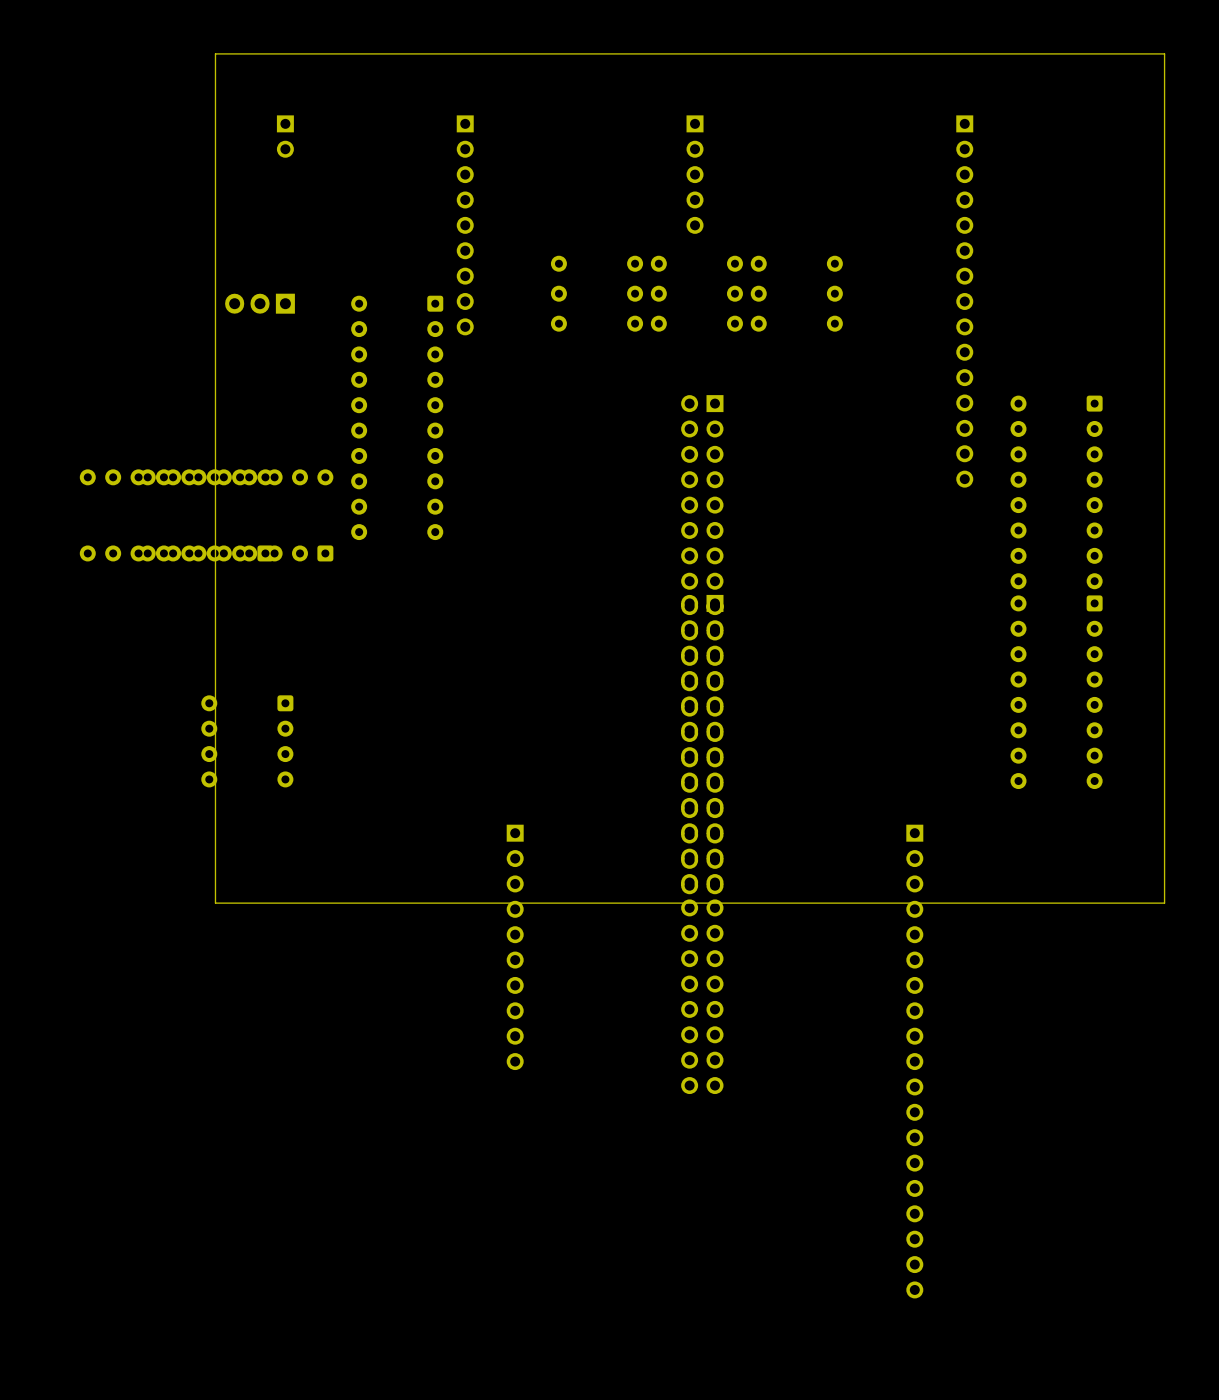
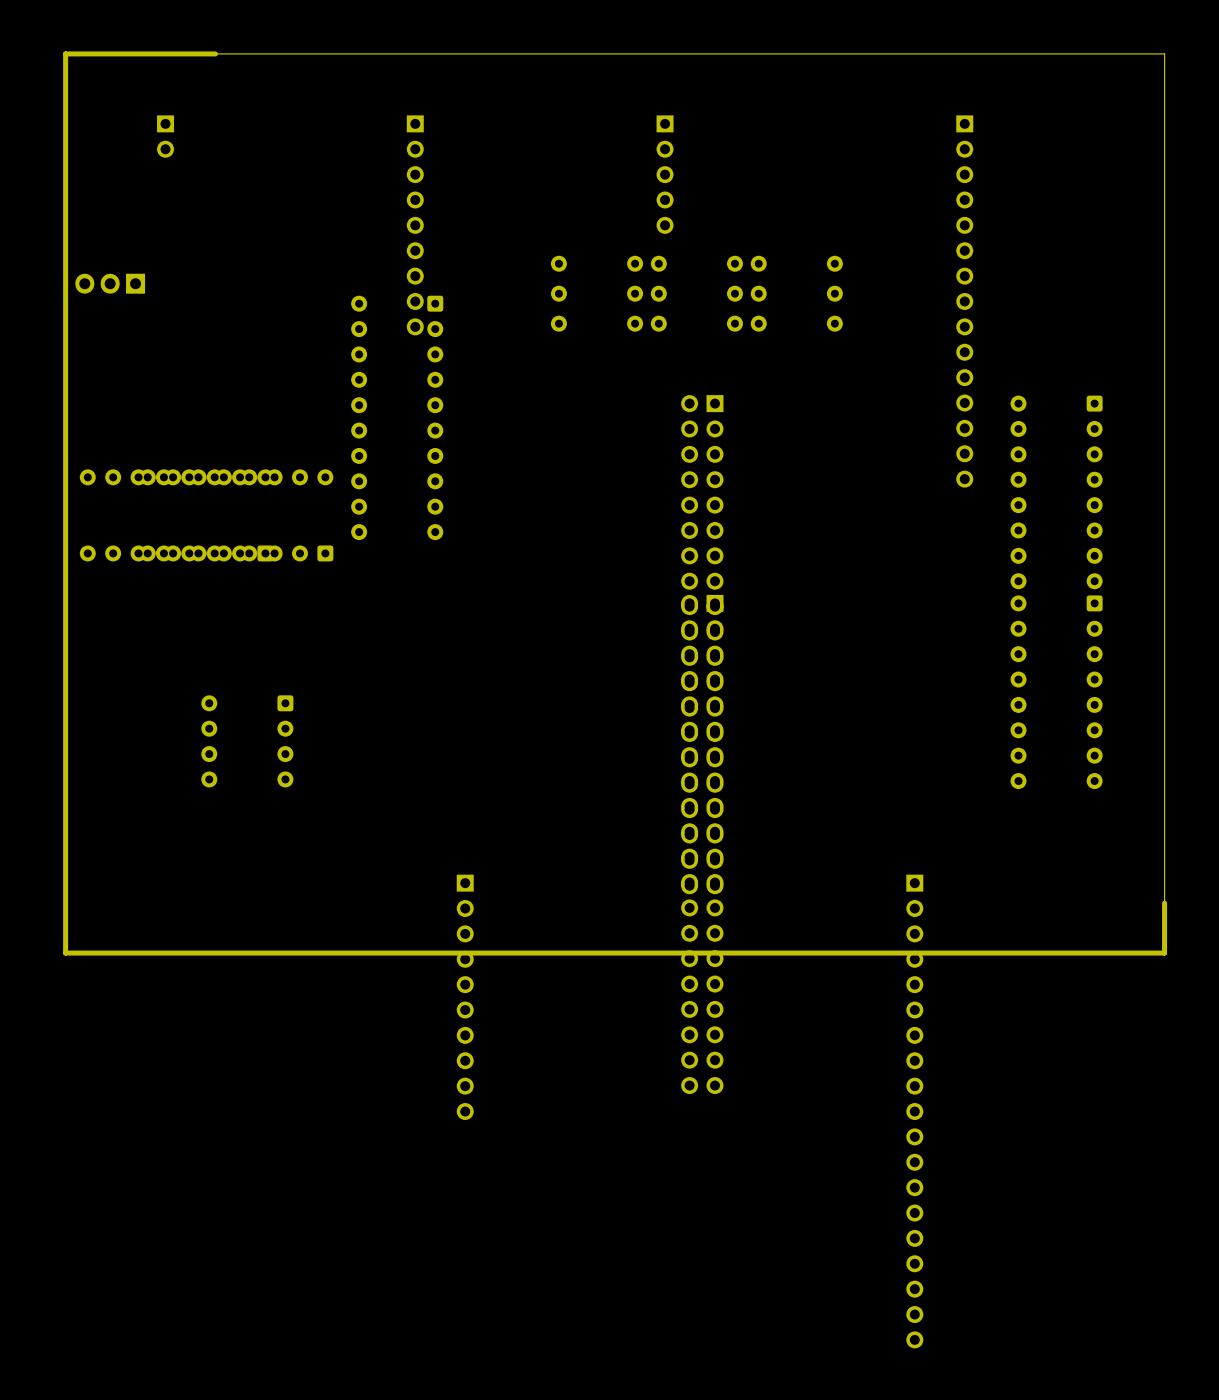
board edge: (215, 53) (215, 903) (1164, 903) -> (215, 53) (65, 53) (65, 953) (1164, 953) (1164, 903)
part position: (285, 136) -> (165, 136)
part position: (695, 174) -> (665, 174)
part position: (465, 225) -> (415, 225)
part position: (260, 303) -> (110, 283)
part position: (515, 947) -> (465, 997)
part position: (914, 1061) -> (914, 1111)

